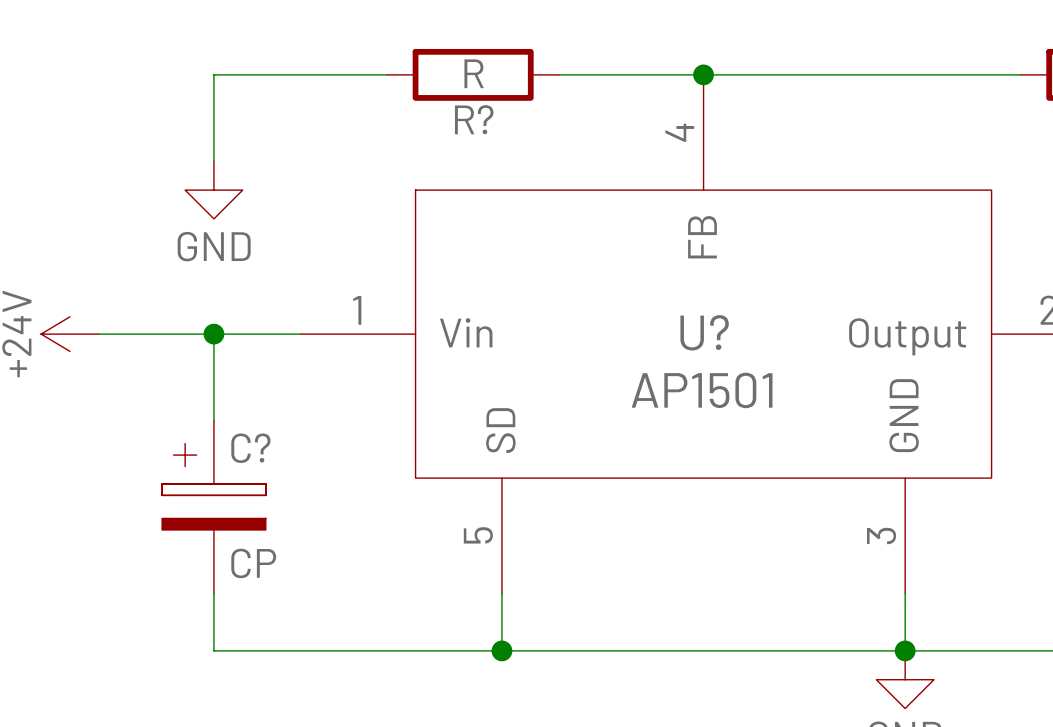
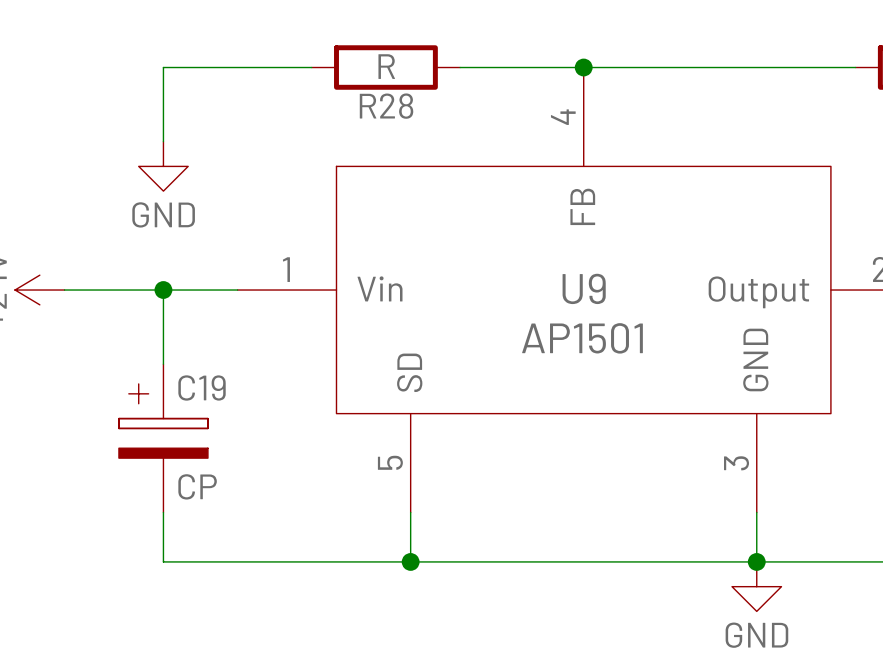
R? name: R? (474, 119) -> R28 (386, 106)
U? name: U? (704, 332) -> U9 (584, 288)
C? name: C? (250, 448) -> C19 (202, 387)

